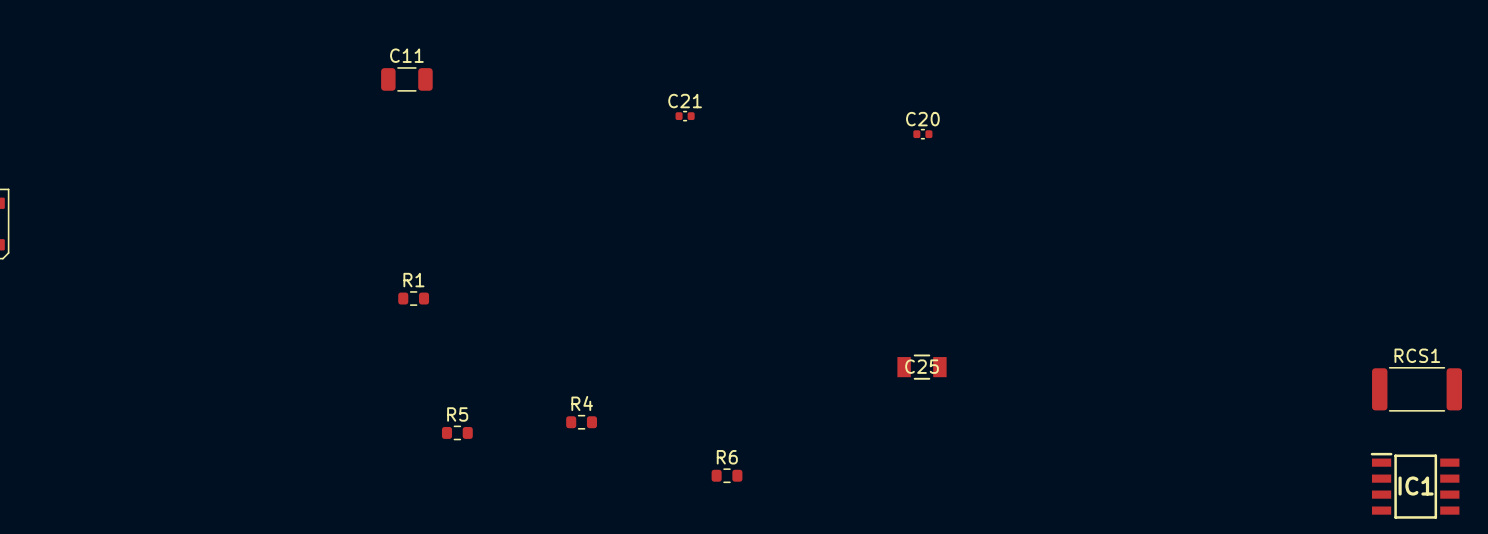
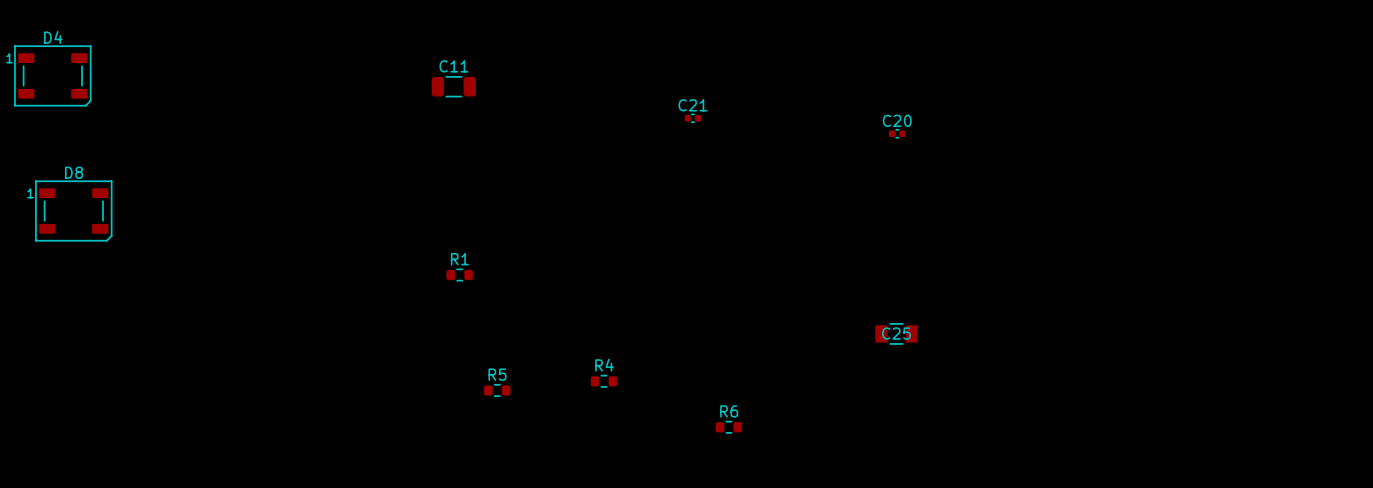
RCS1: (1417, 389) -> none
IC1: (1415, 485) -> none

